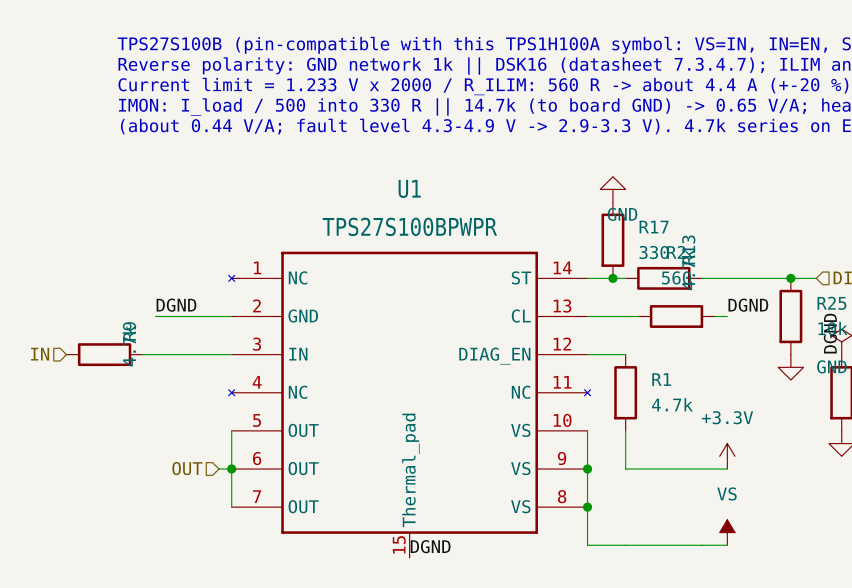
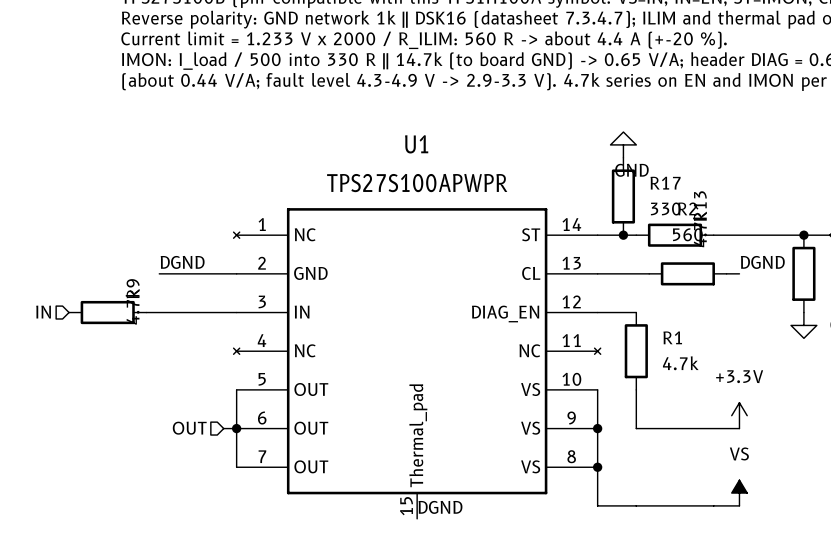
U1 value: TPS27S100BPWPR (409, 226) -> TPS27S100APWPR (417, 183)

